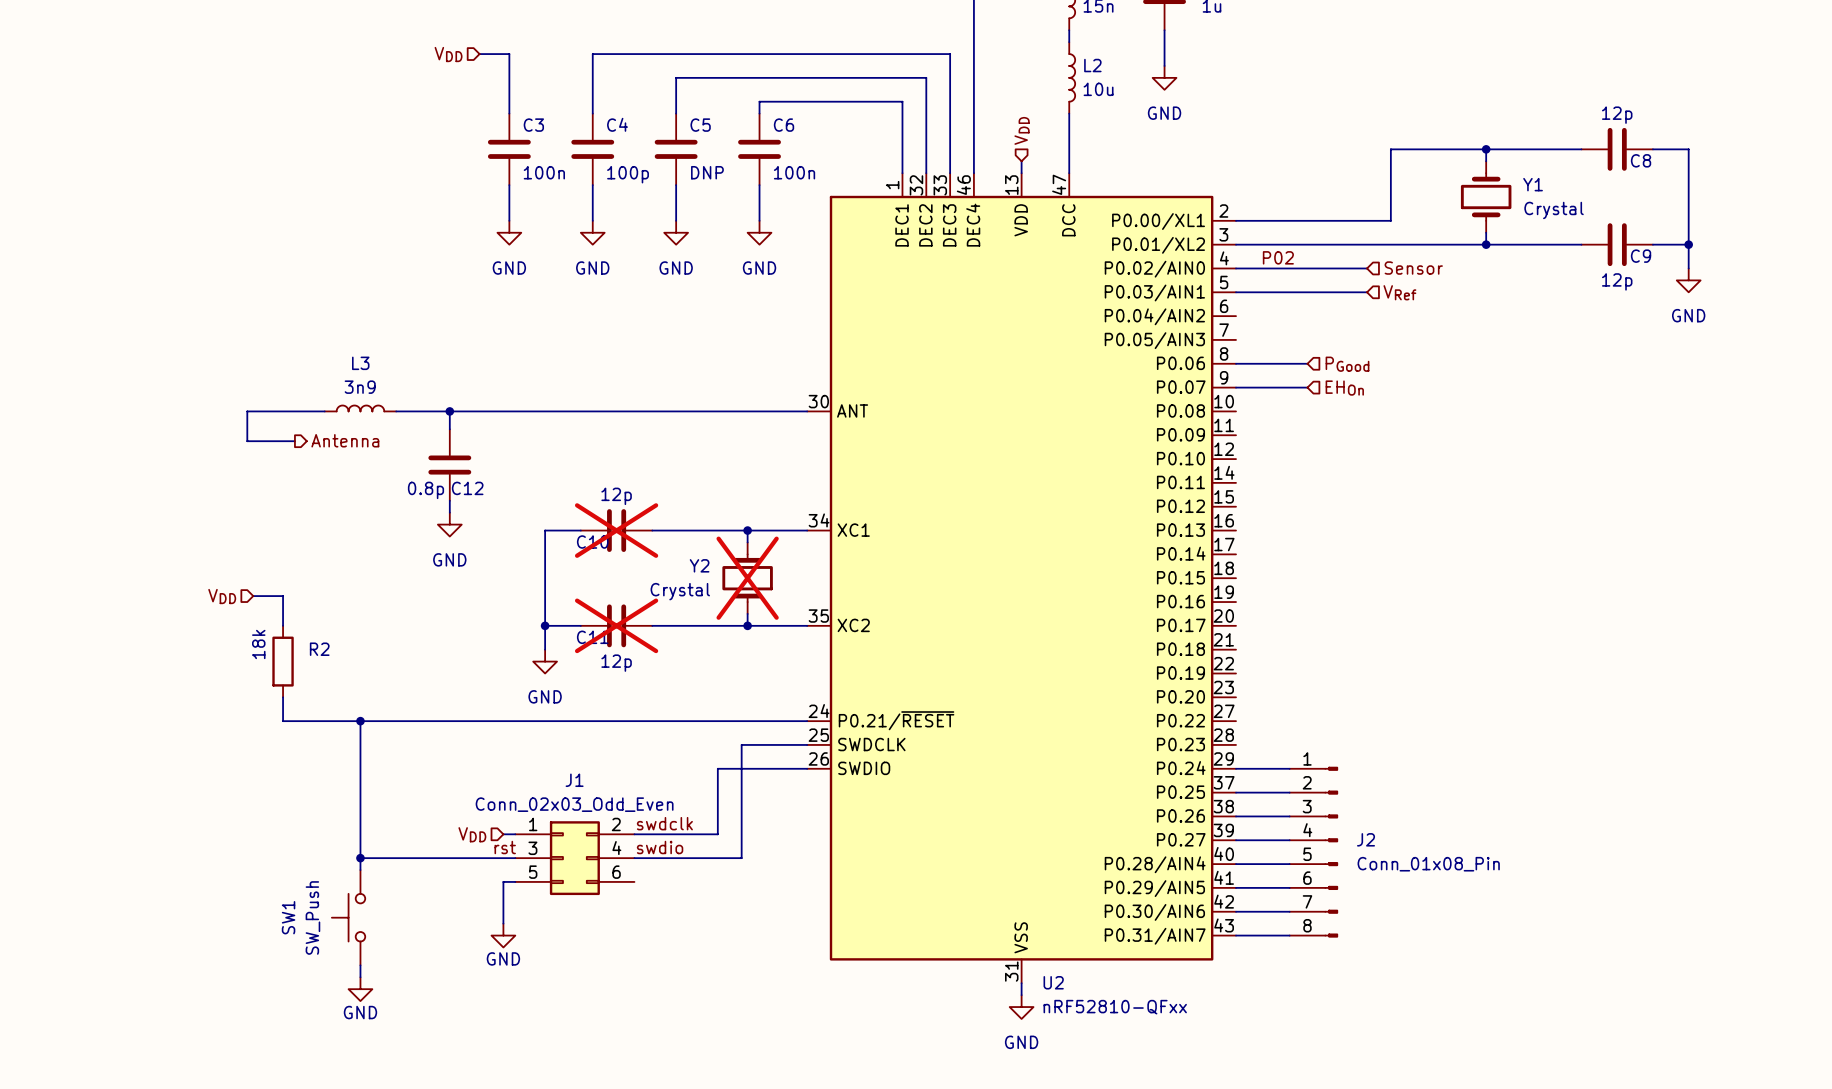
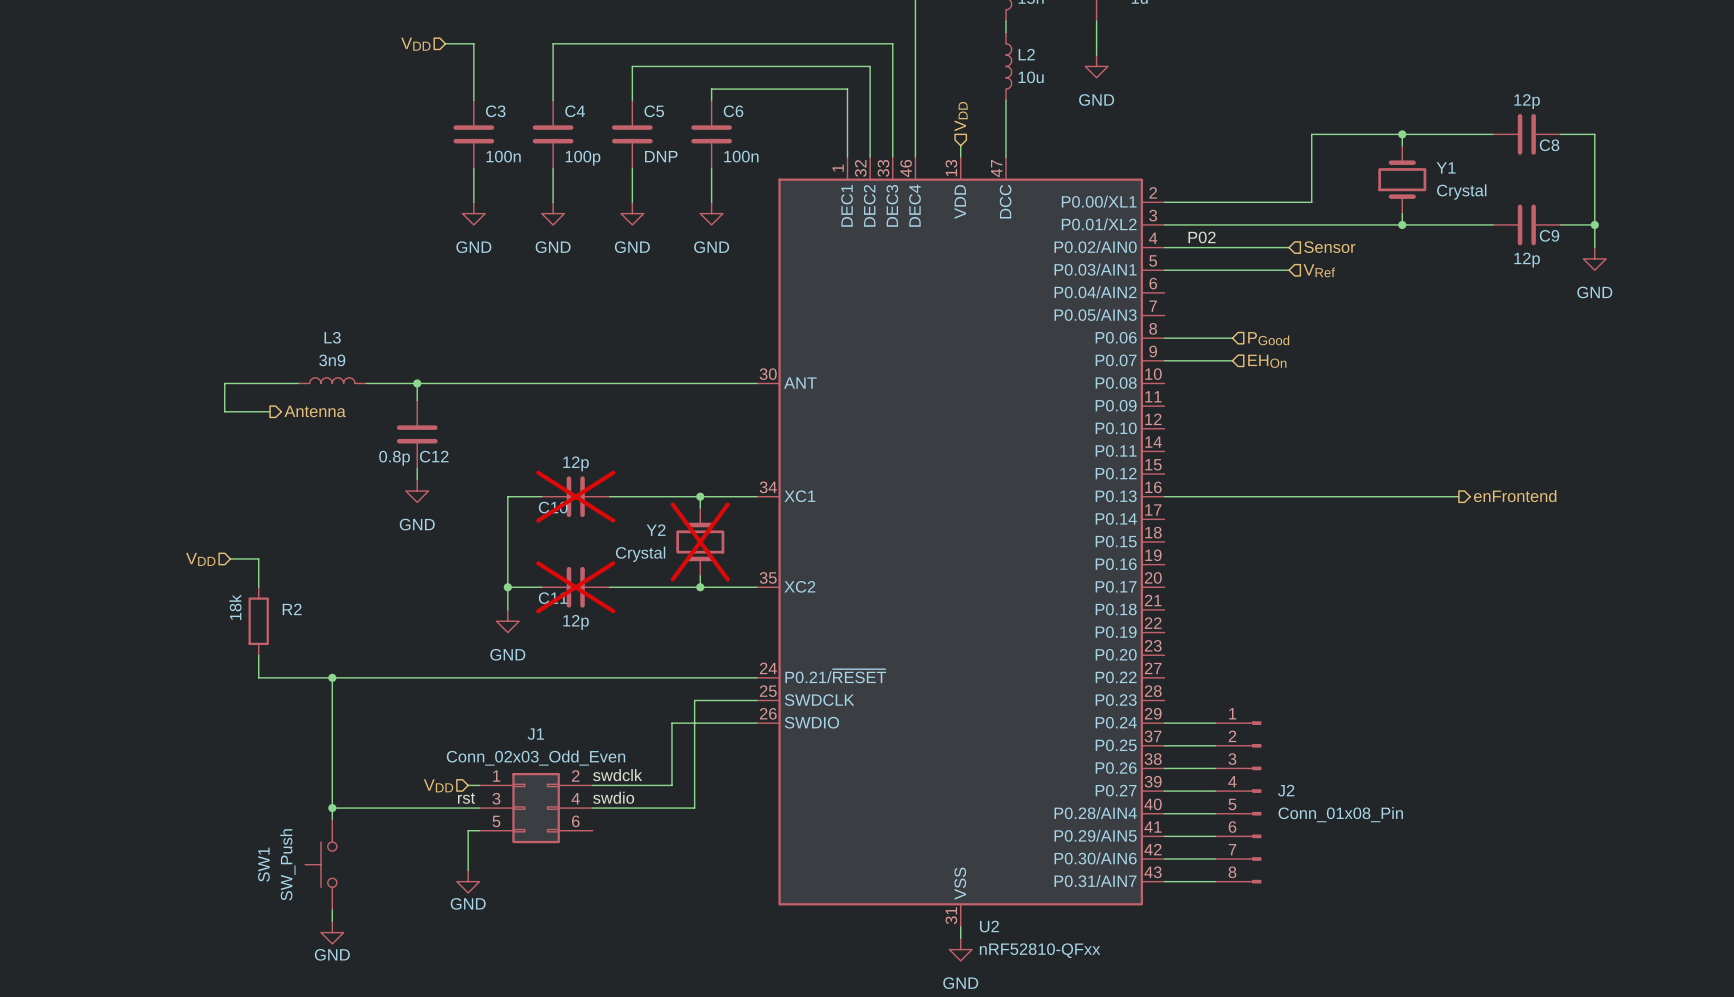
wire: none -> (1164, 496) (1458, 496)
hierarchical label: none -> enFrontend (1515, 496)

